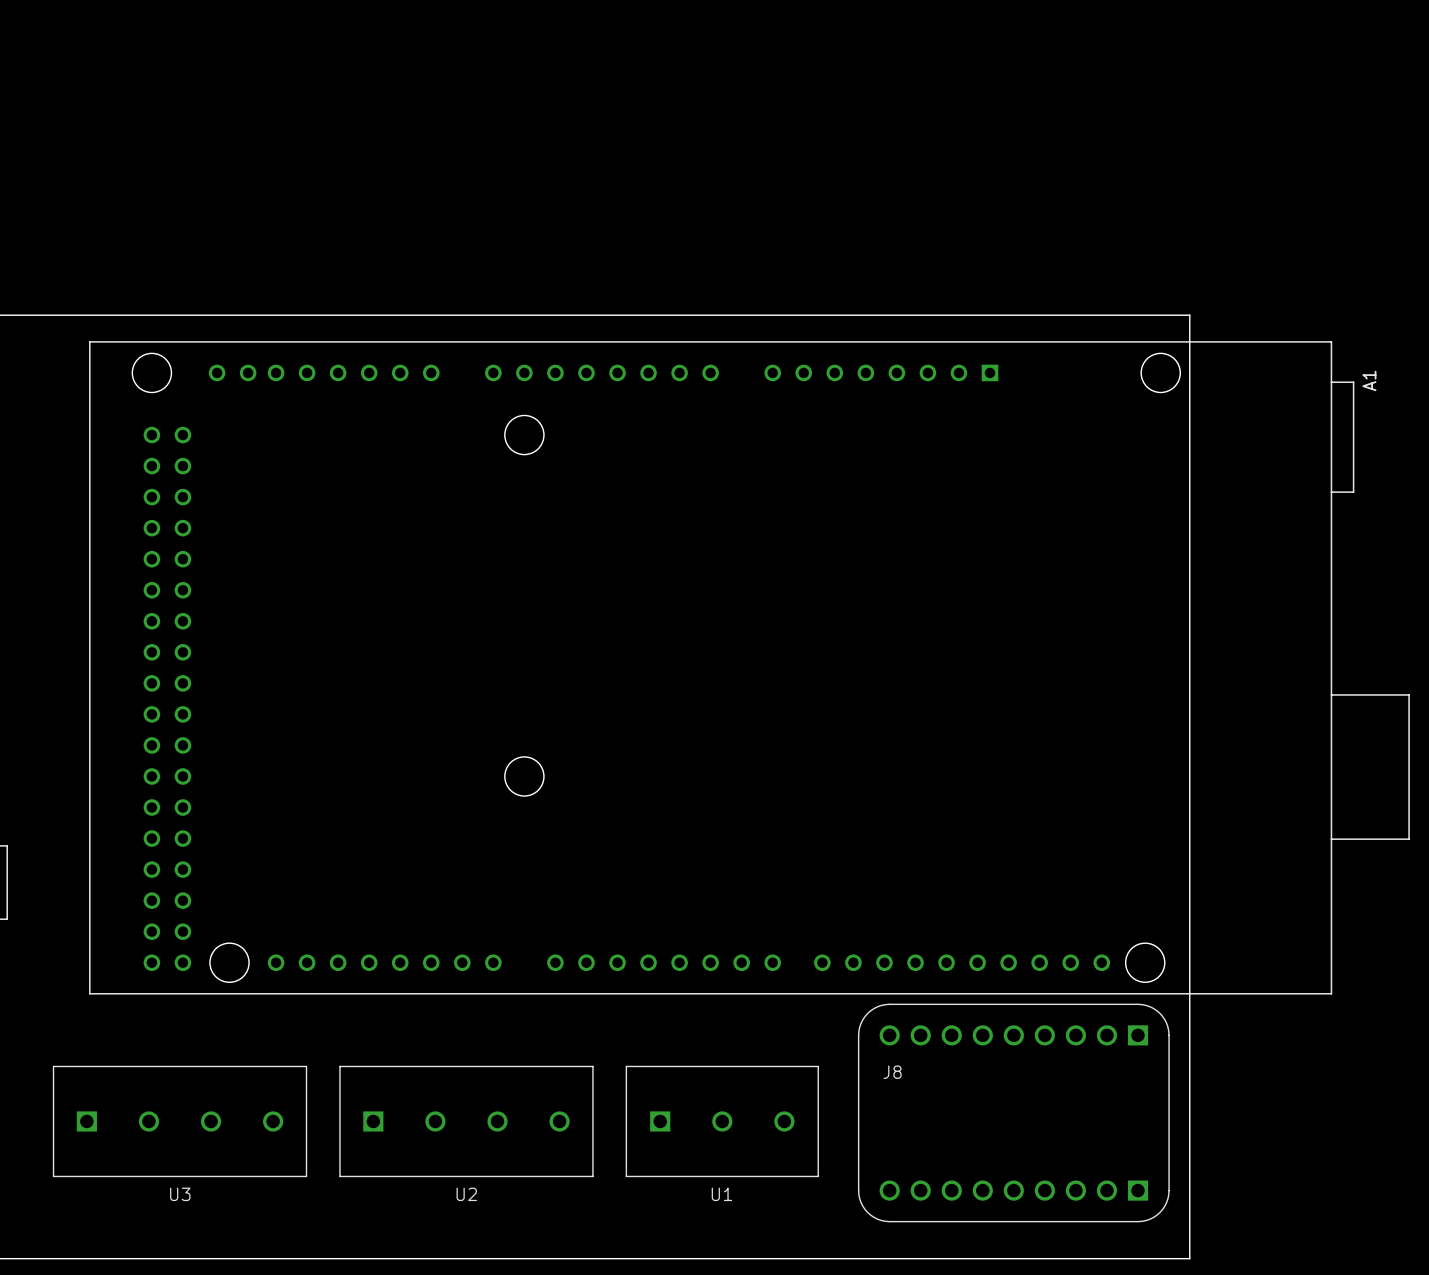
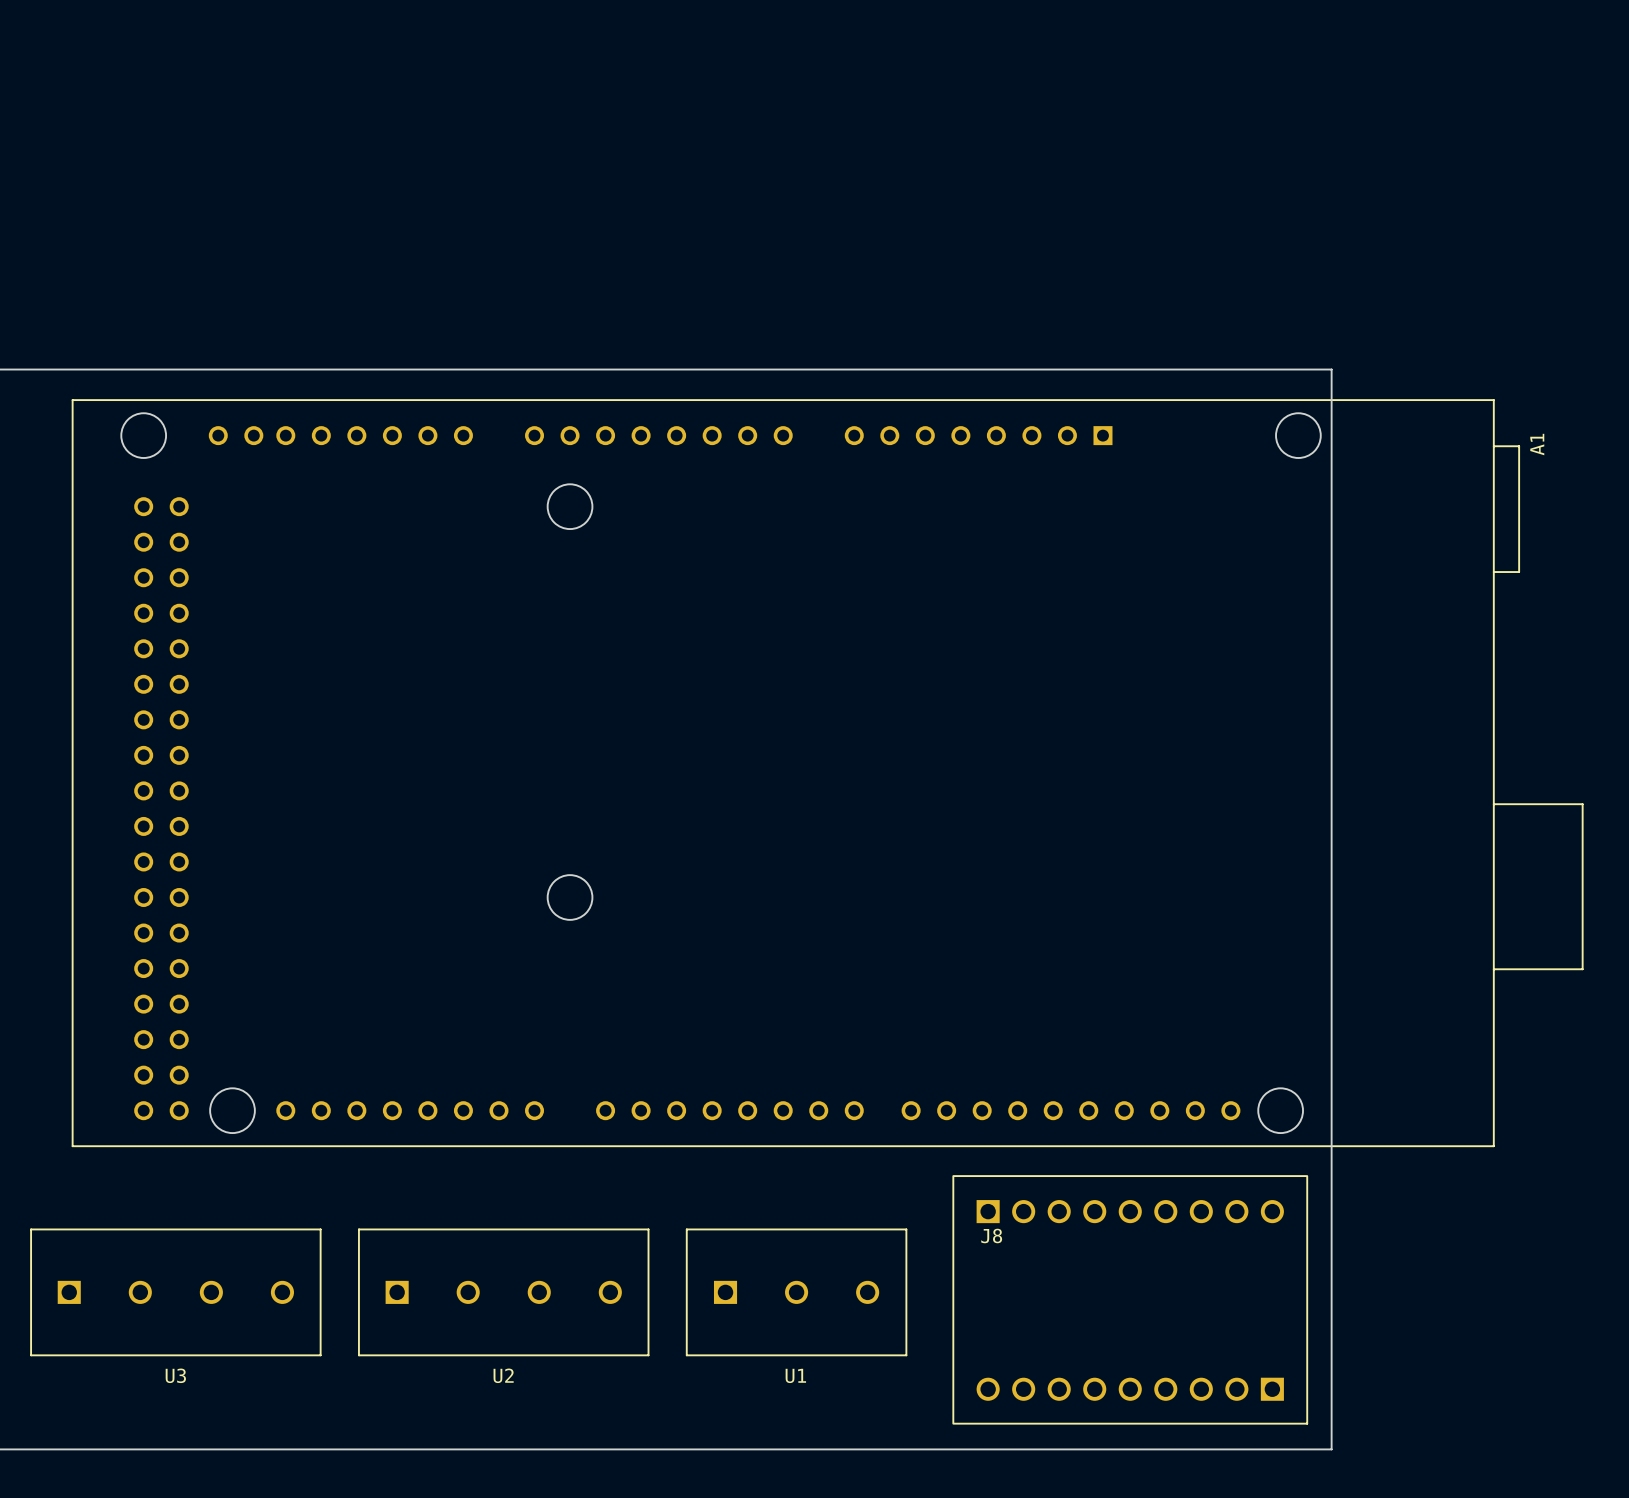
J8 footprint: [858, 1003, 1170, 1223] -> [952, 1175, 1308, 1425]

